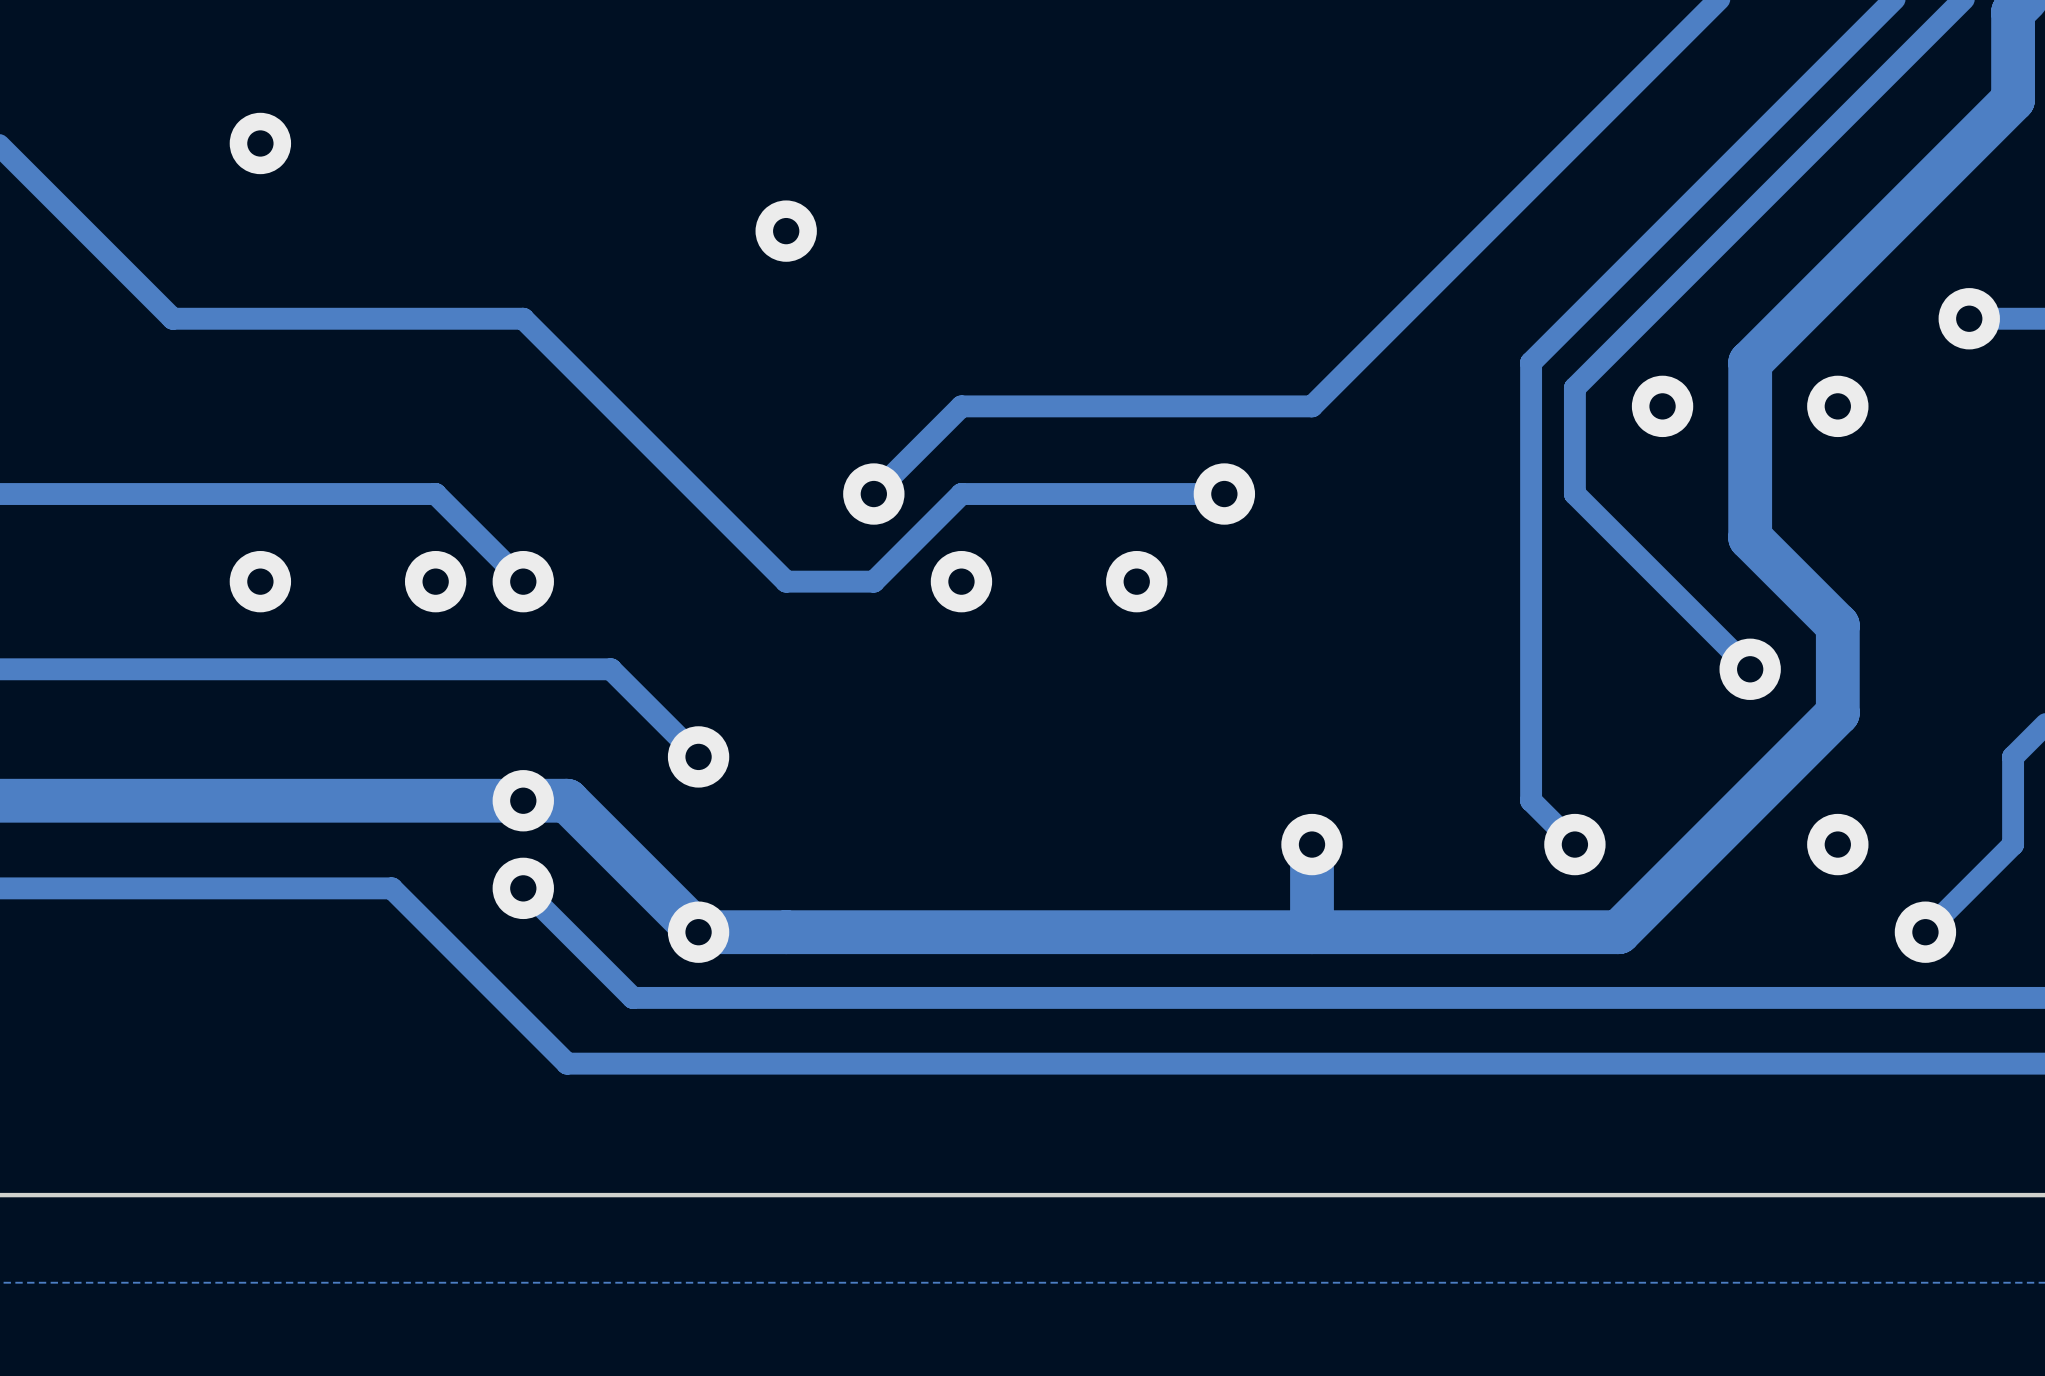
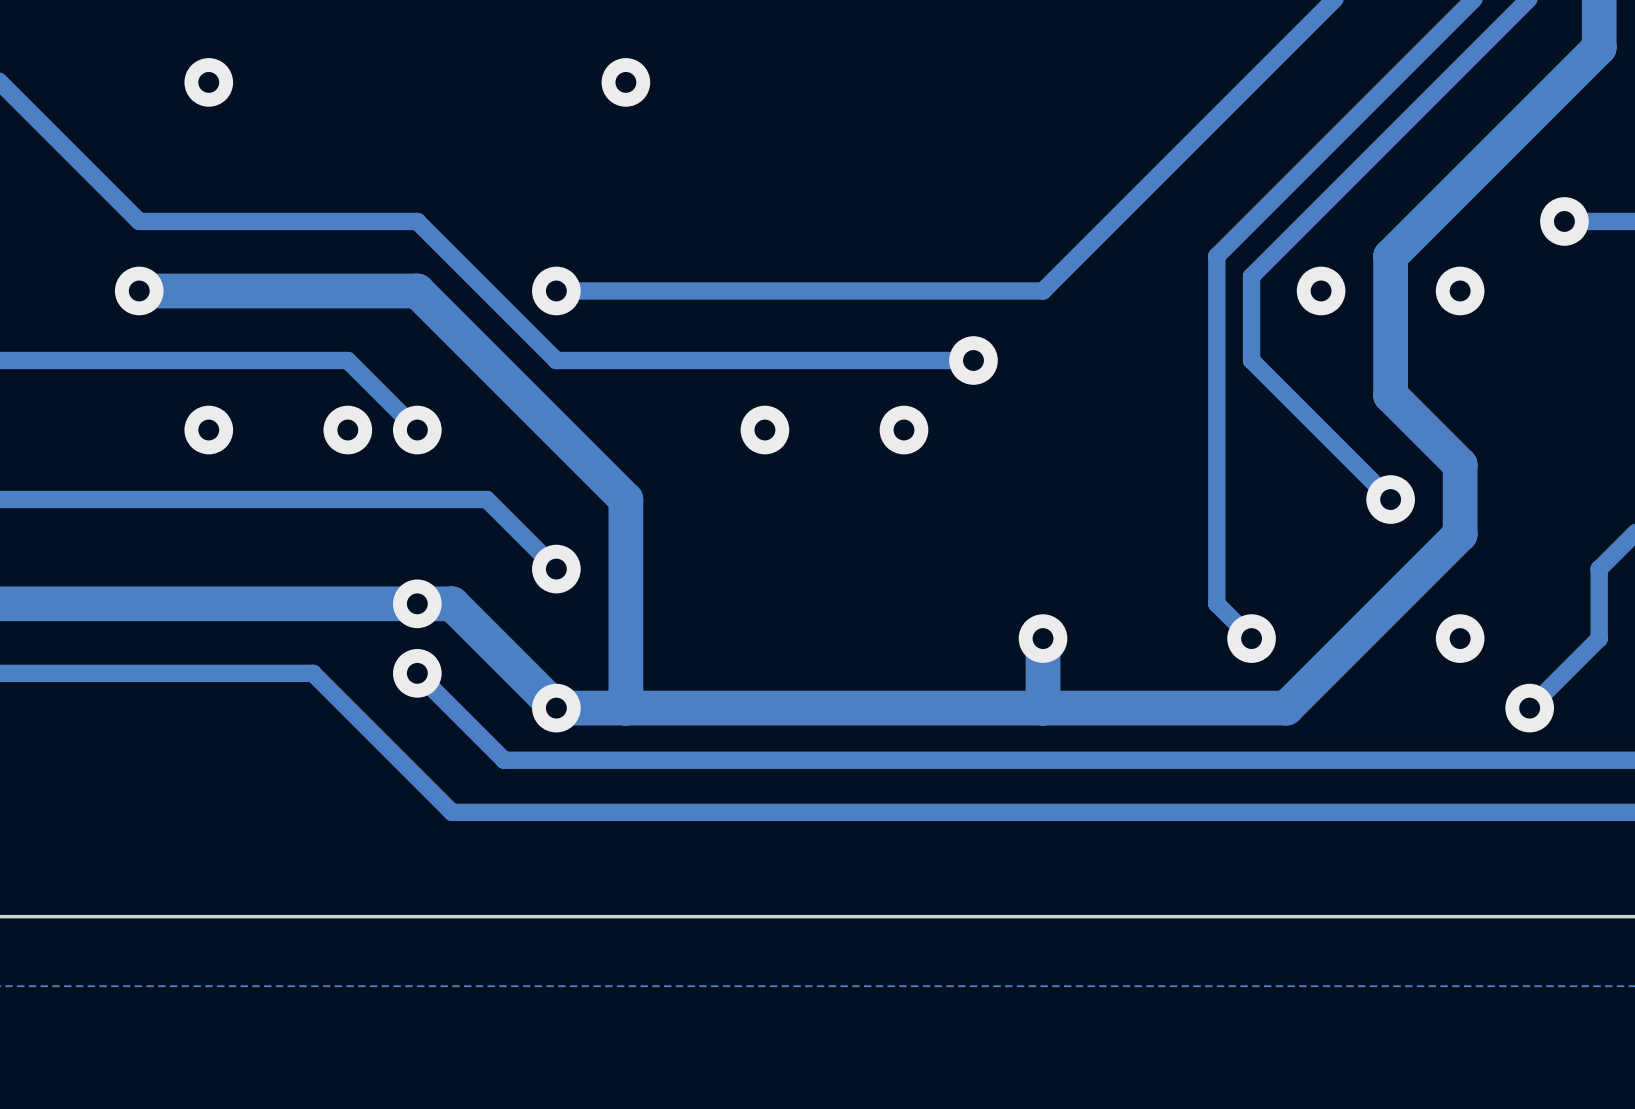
via position: (786, 231) -> (625, 82)
track: none -> (139, 290) (417, 290) (625, 499) (625, 708)
via: none -> (139, 290)
via: none -> (556, 290)
track: (961, 406) (873, 494) -> (764, 290) (556, 290)
via: (873, 494) -> none
track: (961, 494) (873, 581) (786, 581) (698, 494) -> (764, 360) (556, 360)

